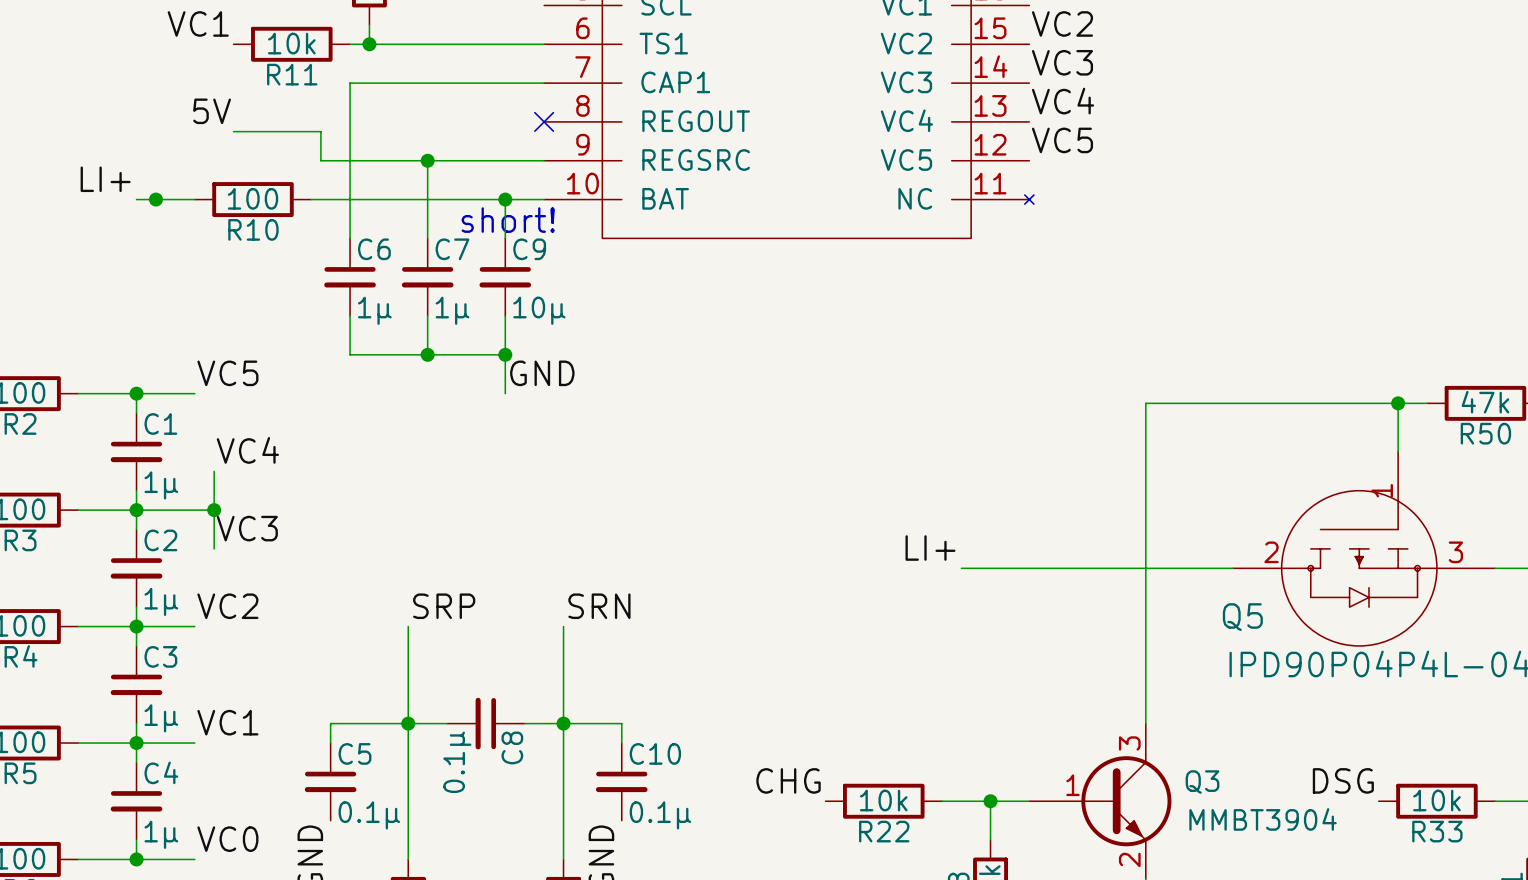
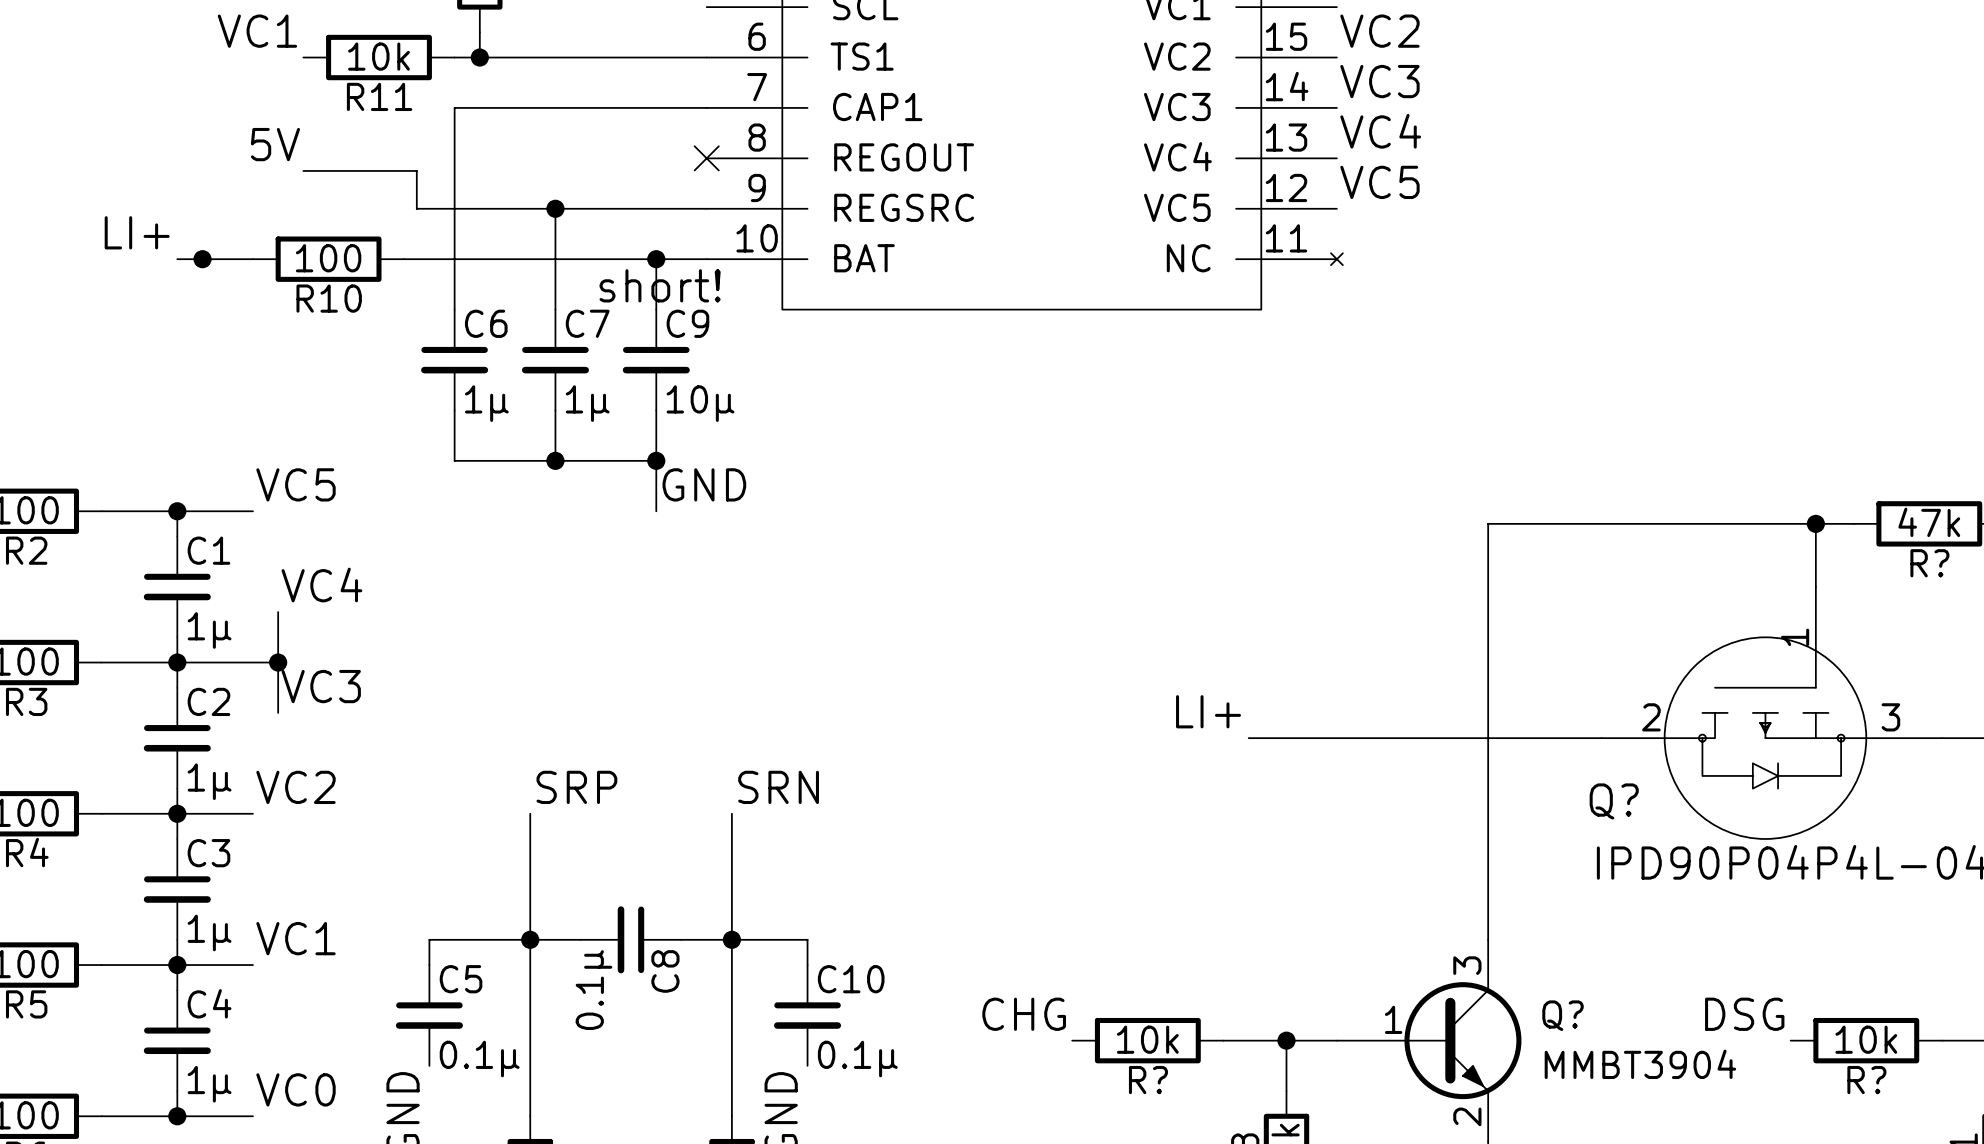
R50 name: R50 (1485, 433) -> R? (1929, 563)
Q5 name: Q5 (1242, 617) -> Q? (1614, 801)
Q3 name: Q3 (1202, 782) -> Q? (1563, 1015)
R22 name: R22 (884, 831) -> R? (1148, 1080)
R33 name: R33 (1437, 831) -> R? (1866, 1080)

